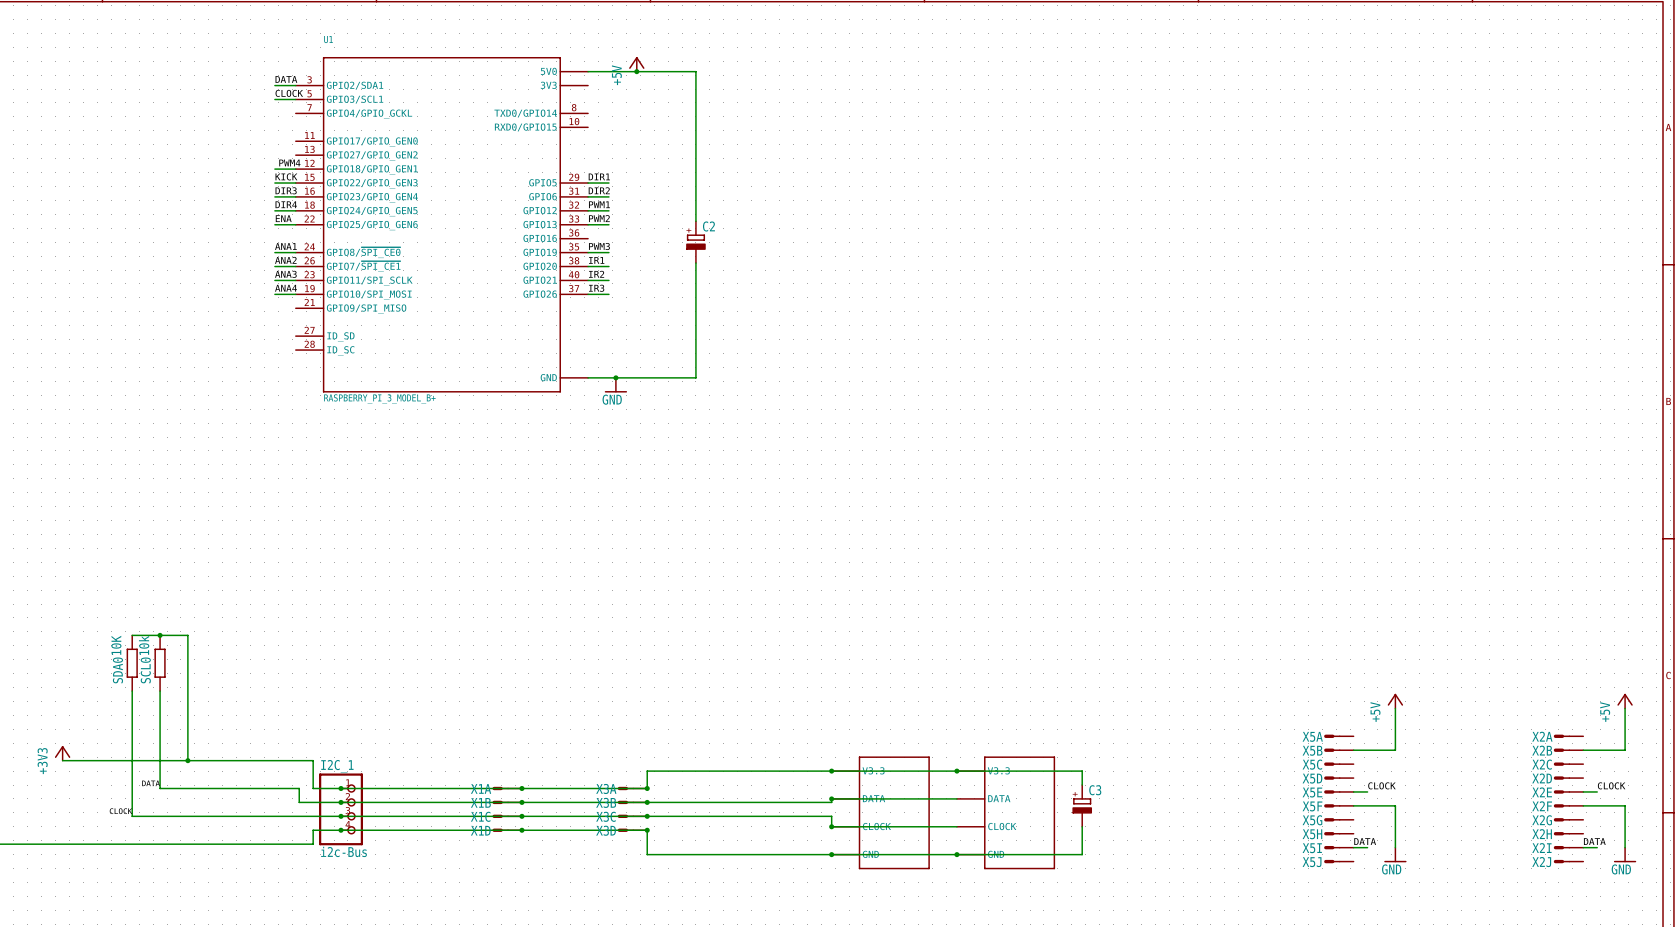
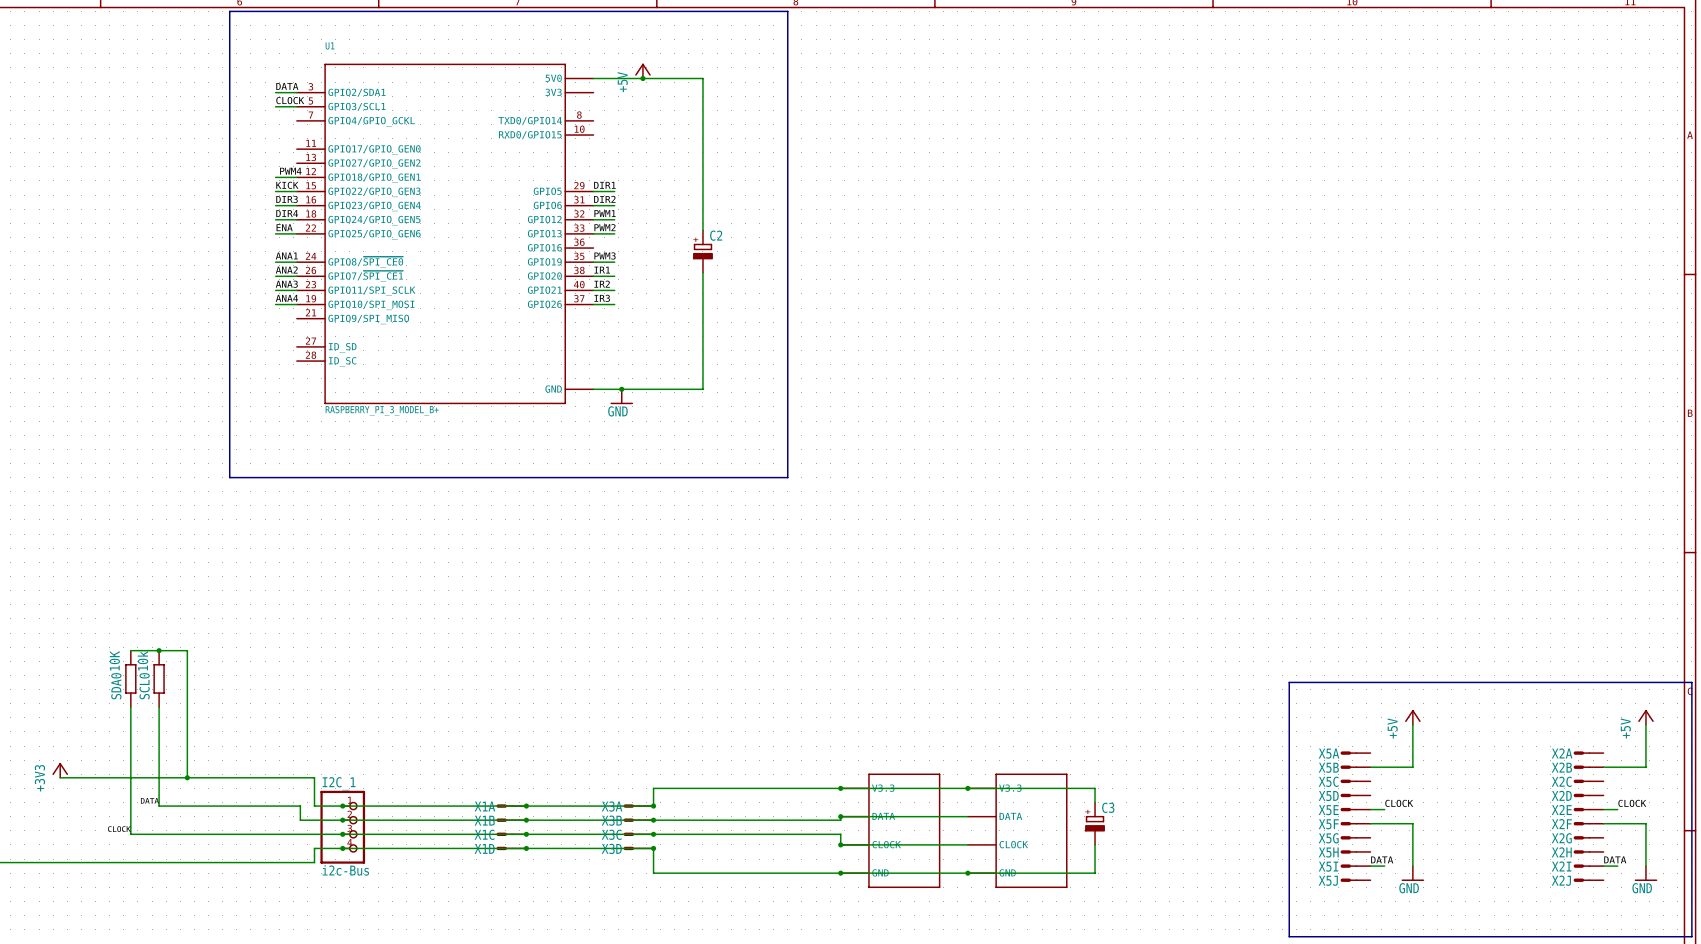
line: none -> (229, 11) (787, 11) (787, 477) (229, 477) (229, 11)
line: none -> (1289, 682) (1691, 682) (1691, 936) (1289, 936) (1289, 682)

